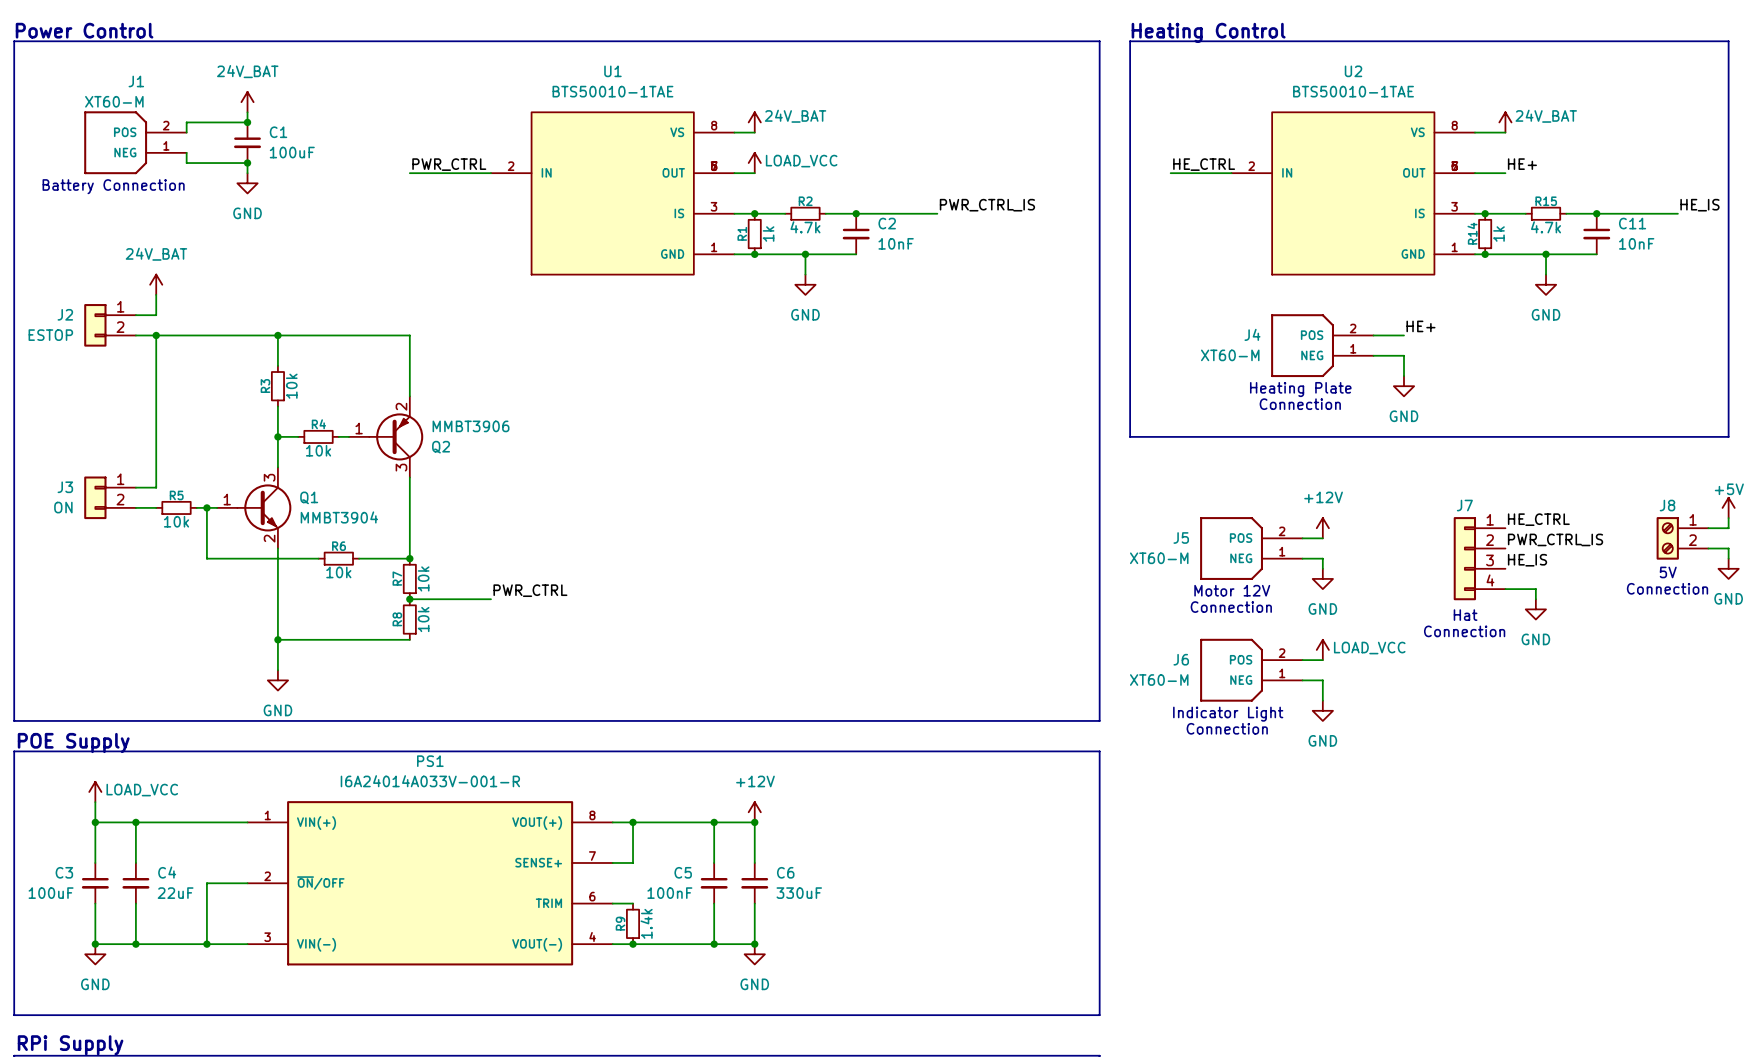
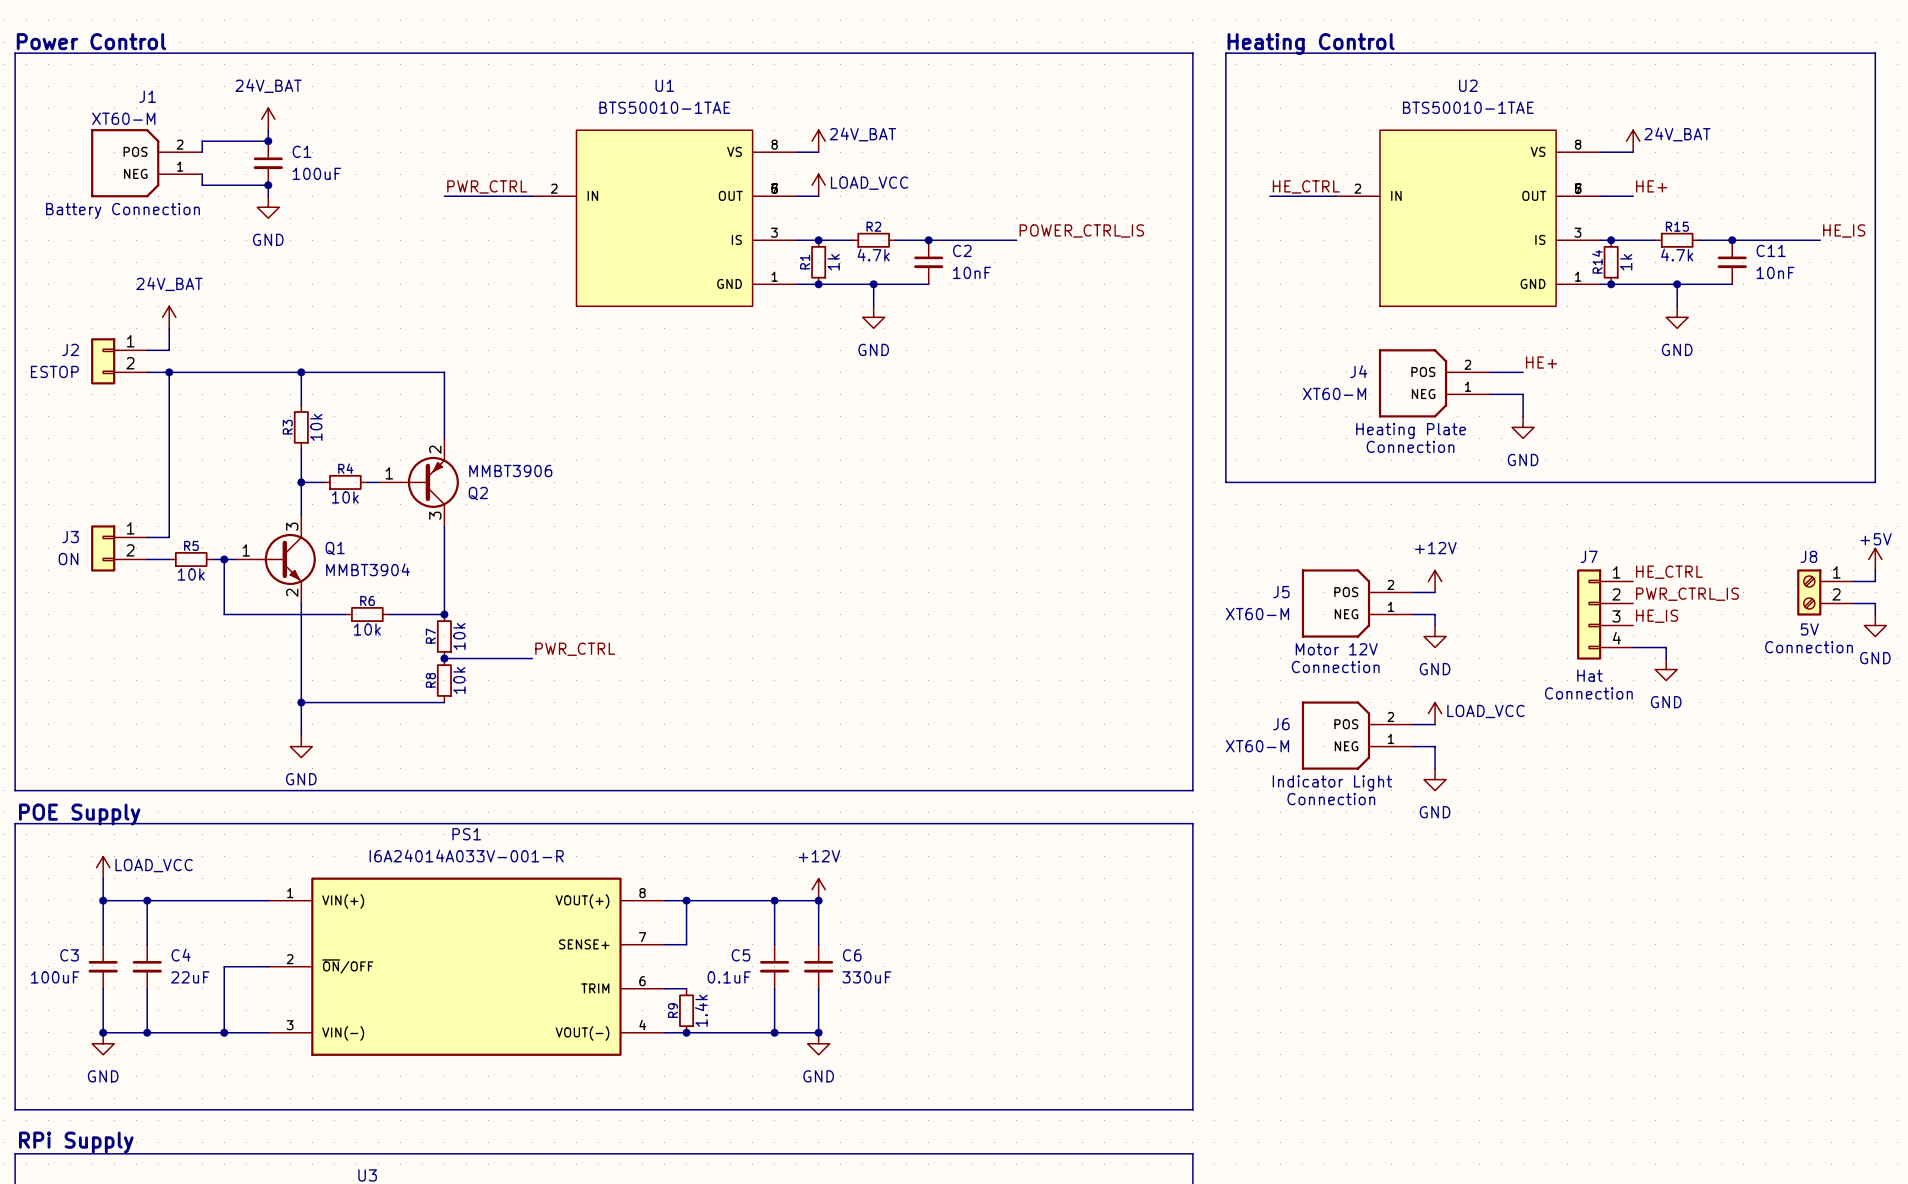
label: PWR_CTRL_IS (987, 205) -> POWER_CTRL_IS (1081, 230)
C5 value: 100nF (669, 893) -> 0.1uF (729, 977)

